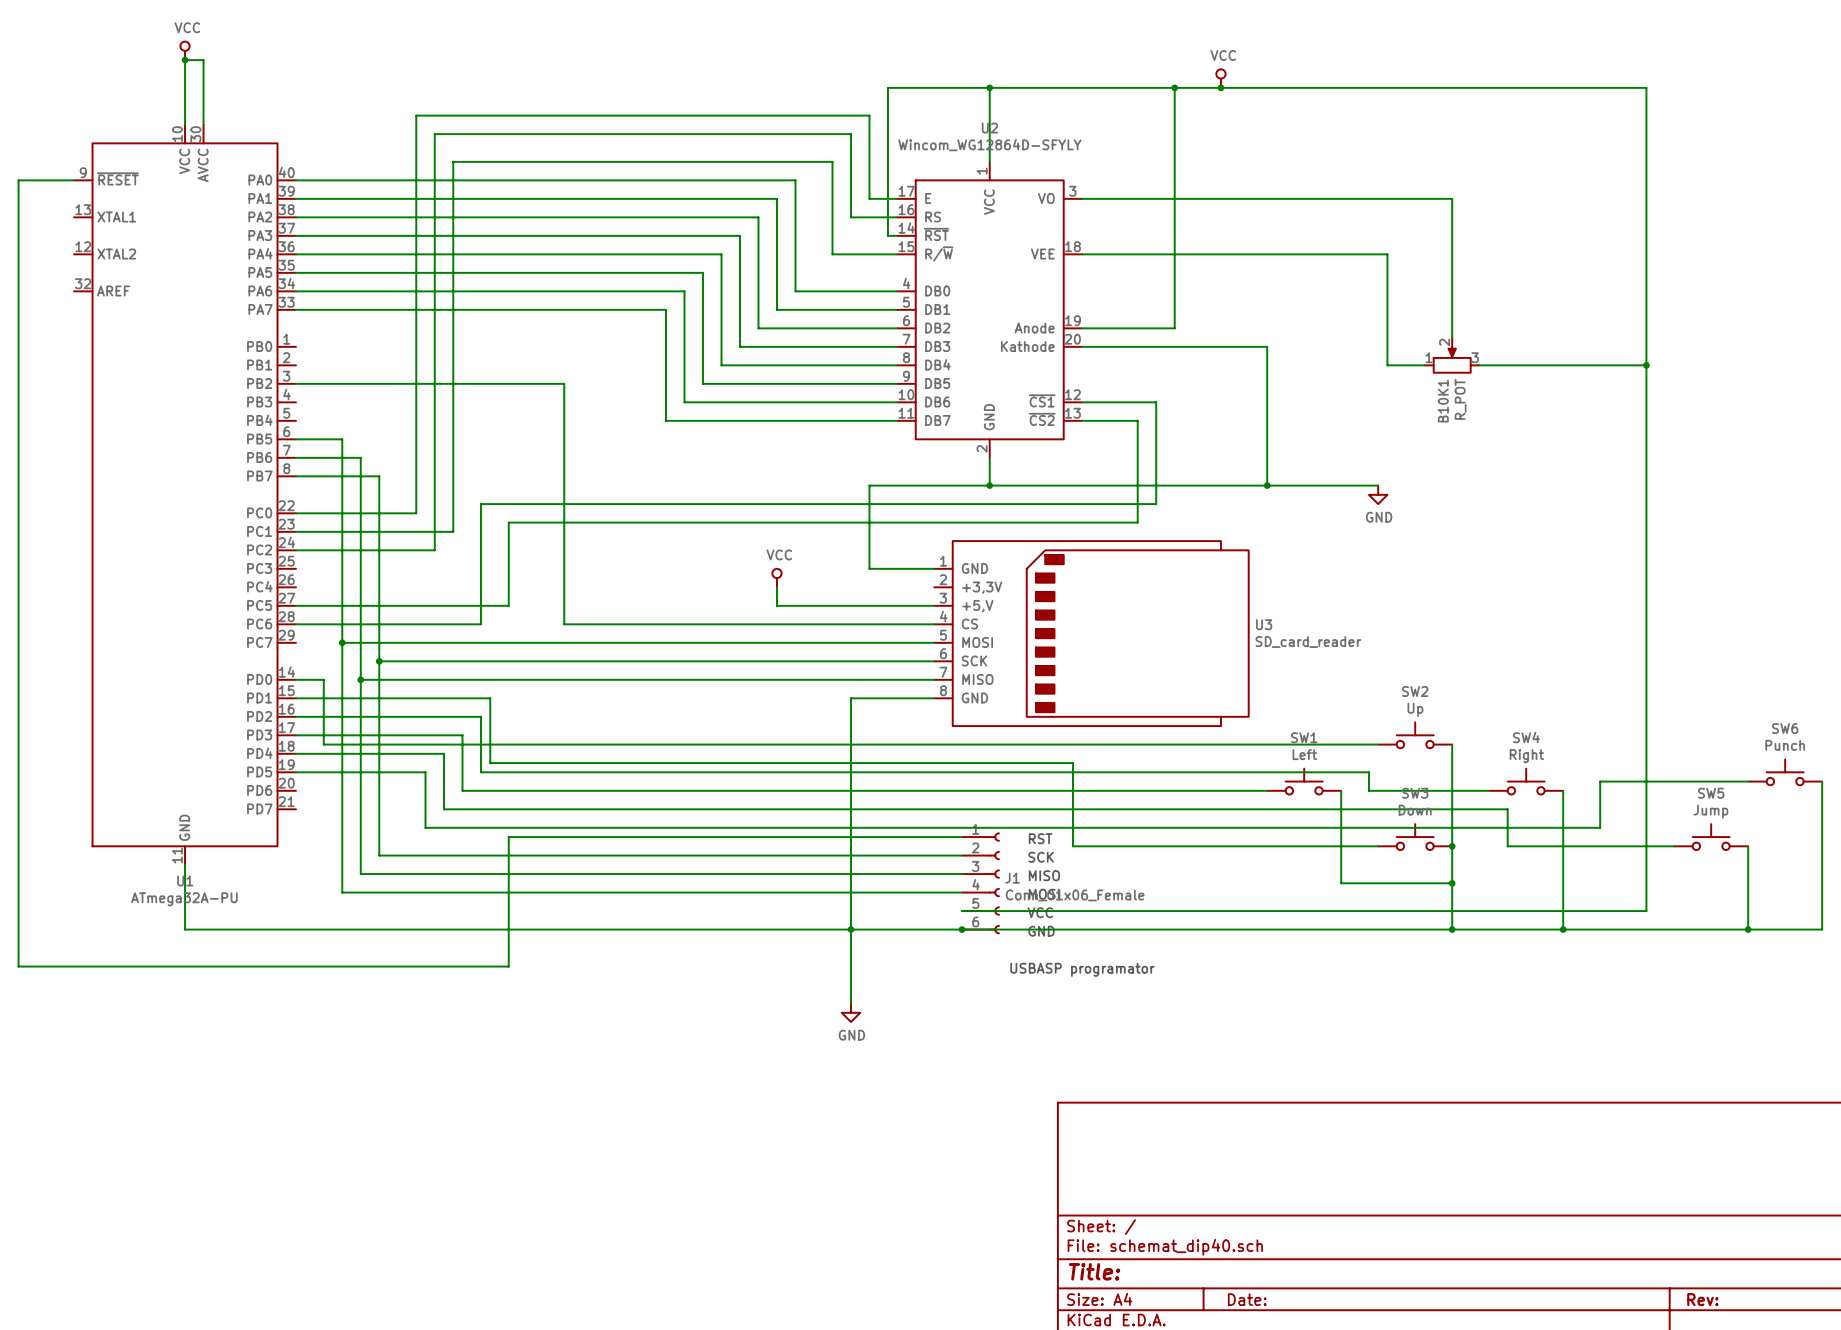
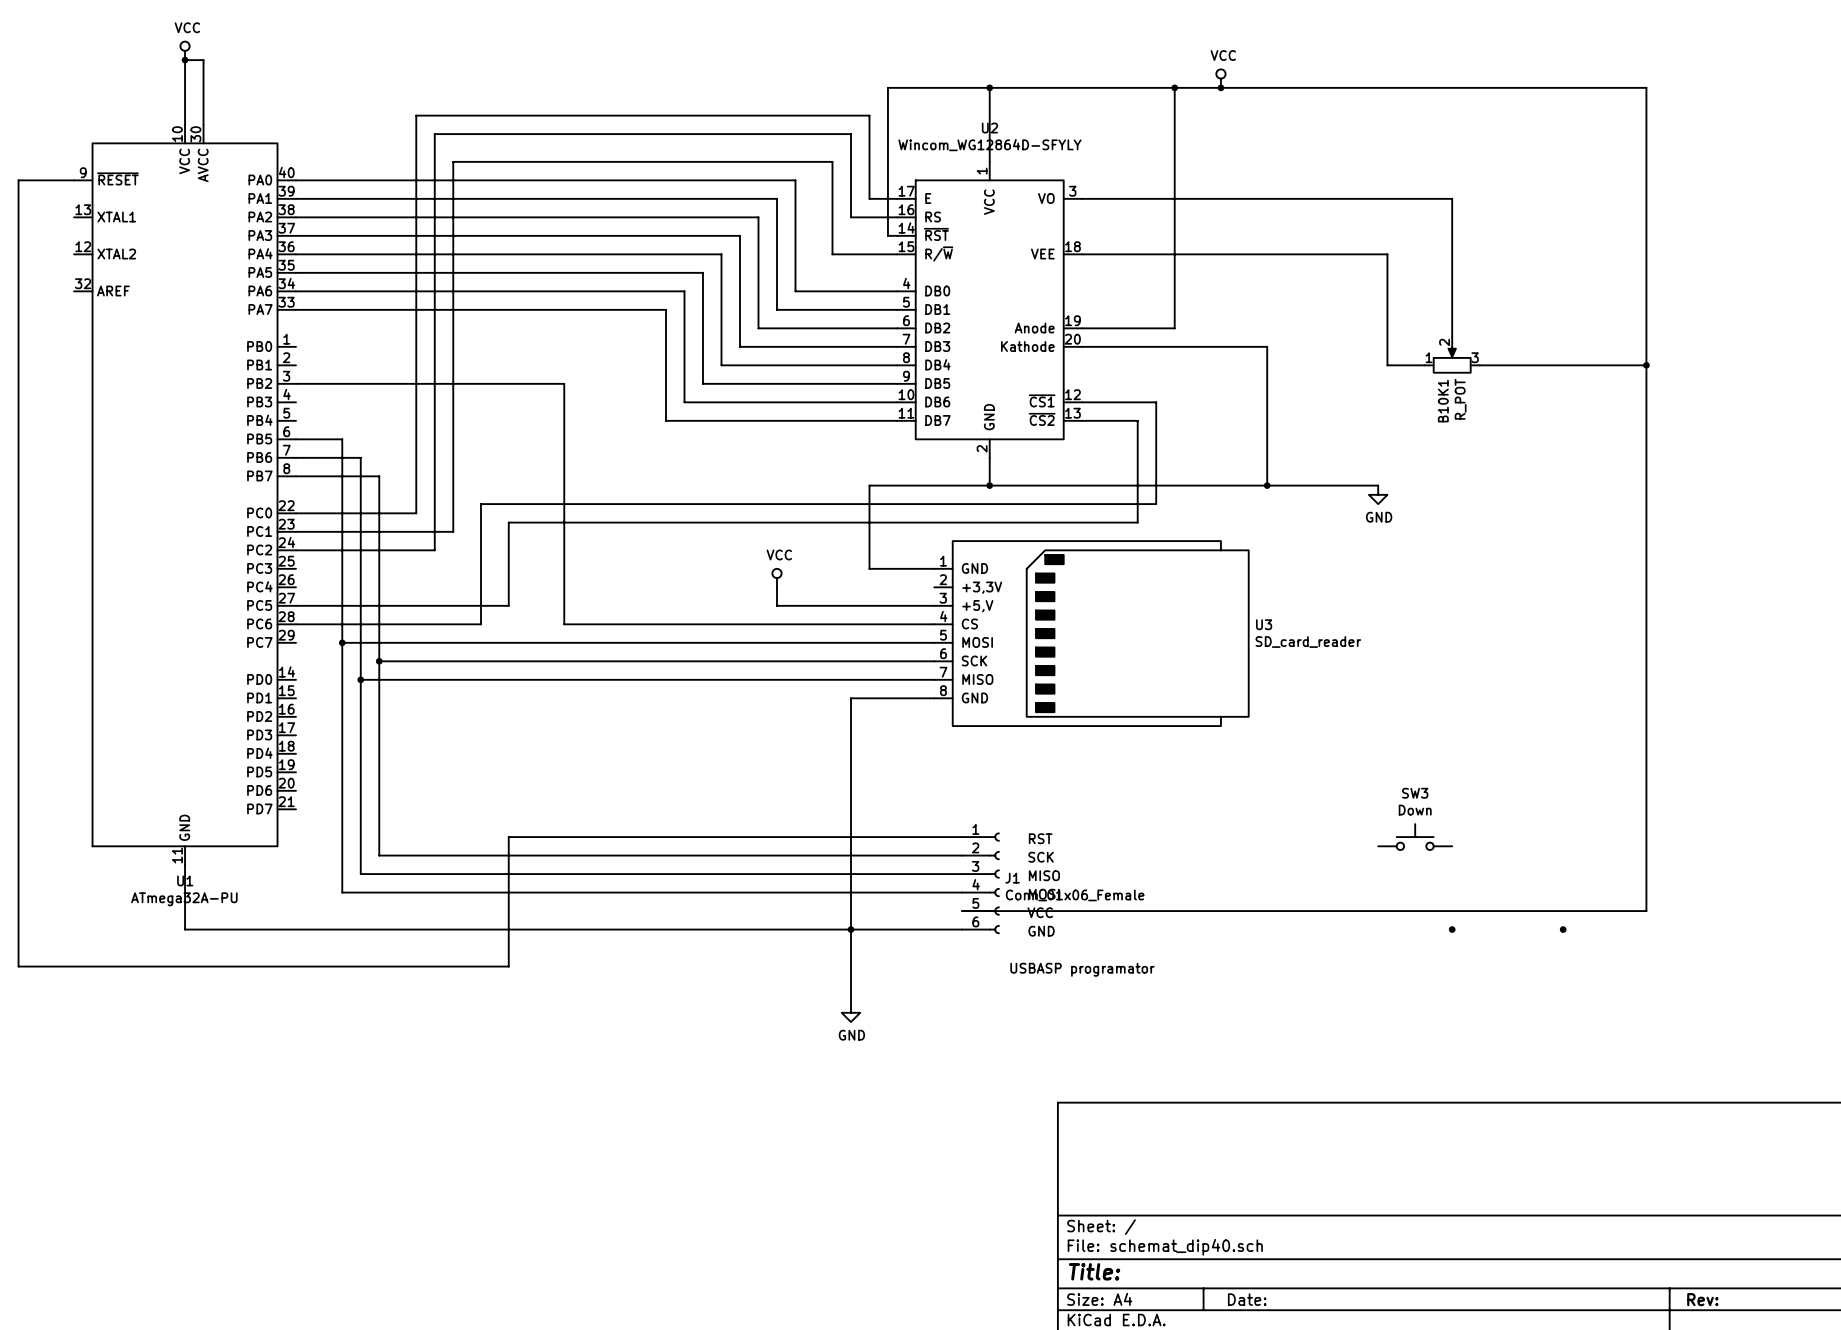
wire: (296, 679) (323, 679) (323, 744) (1378, 744) -> none
wire: (296, 698) (490, 698) (490, 763) (1072, 763) (1072, 846) (1378, 846) -> none
wire: (296, 716) (481, 716) (481, 772) (1368, 772) (1368, 790) (1489, 790) -> none
wire: (296, 735) (462, 735) (462, 790) (1267, 790) -> none
SW2: Up (1415, 735) -> none
wire: (1452, 744) (1452, 929) -> none
wire: (296, 753) (444, 753) (444, 809) (1507, 809) (1507, 846) (1674, 846) -> none
wire: (296, 772) (425, 772) (425, 827) (1600, 827) (1600, 781) (1748, 781) -> none
SW6: Punch (1785, 772) -> none
SW1: Left (1304, 781) -> none
SW4: Right (1526, 781) -> none
wire: (1822, 781) (1822, 929) (961, 929) -> none
wire: (1341, 790) (1341, 883) (1452, 883) -> none
wire: (1563, 790) (1563, 929) -> none
SW5: Jump (1711, 837) -> none
junction: (1452, 846) -> none
wire: (1748, 846) (1748, 929) -> none
junction: (1452, 883) -> none
junction: (961, 929) -> none
junction: (1748, 929) -> none

